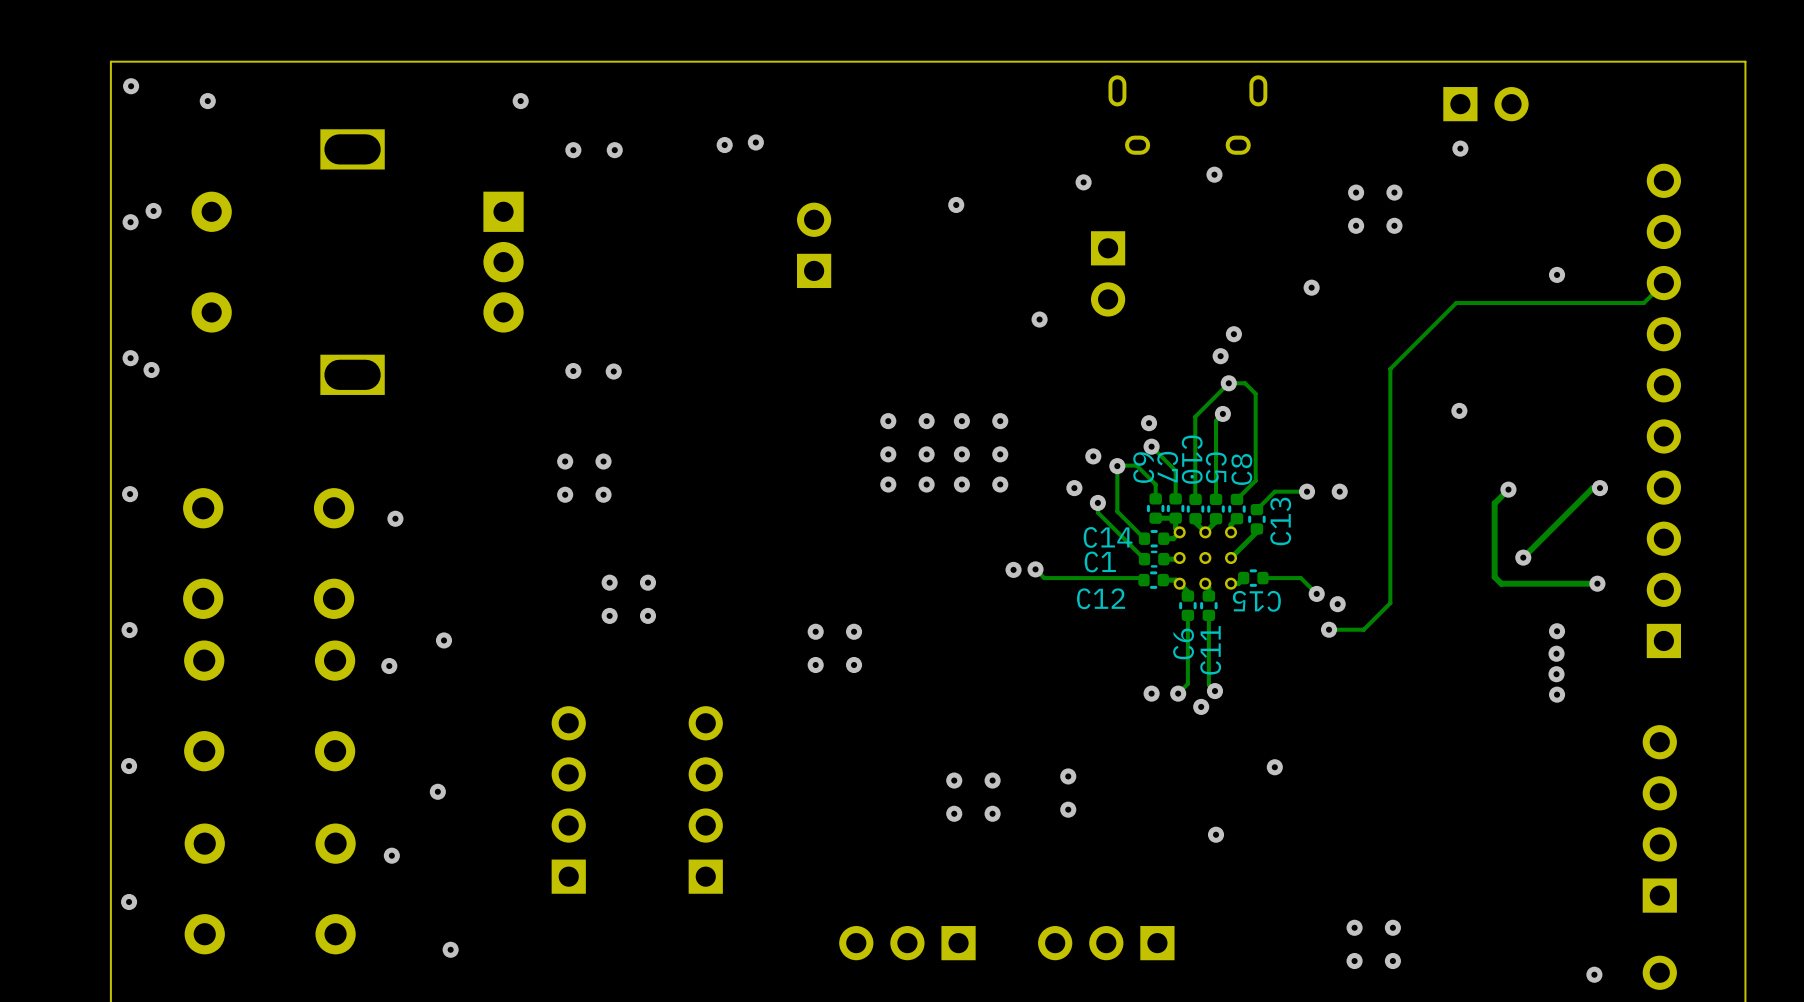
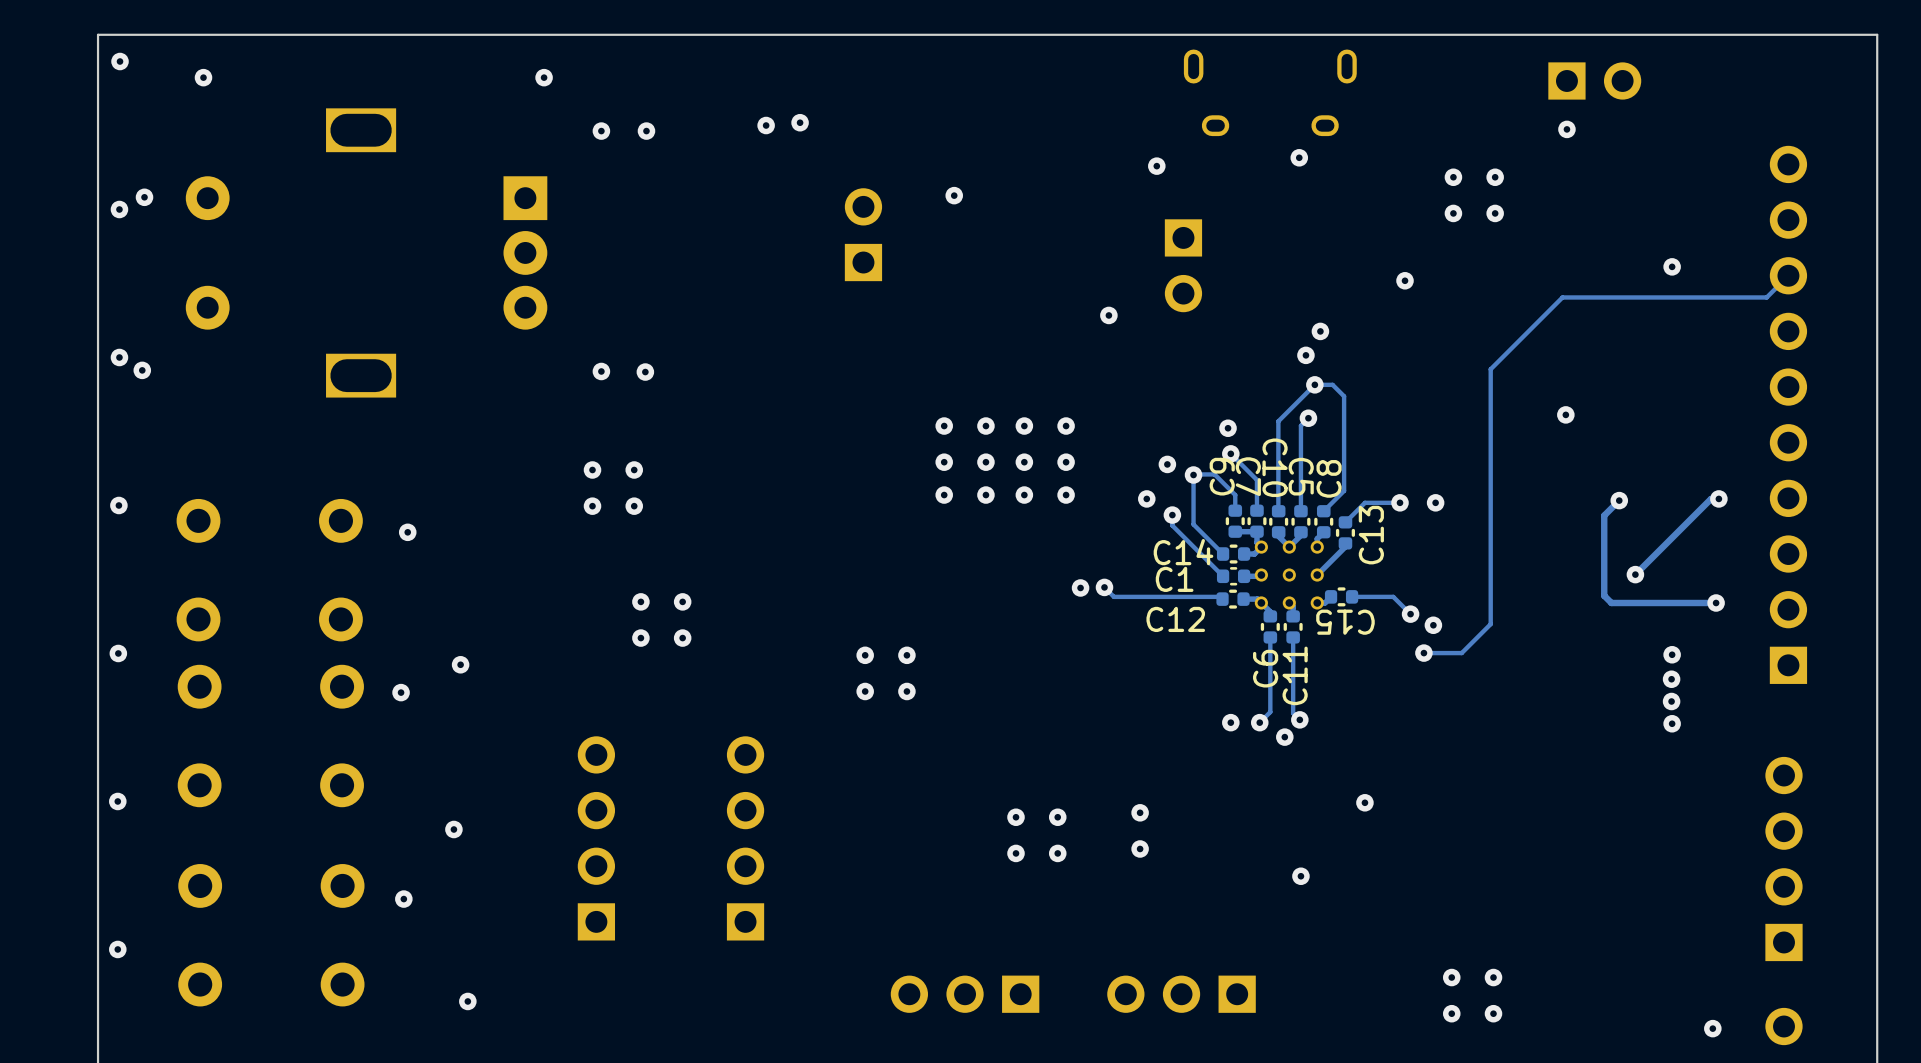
via position: (956, 204) -> (954, 195)

